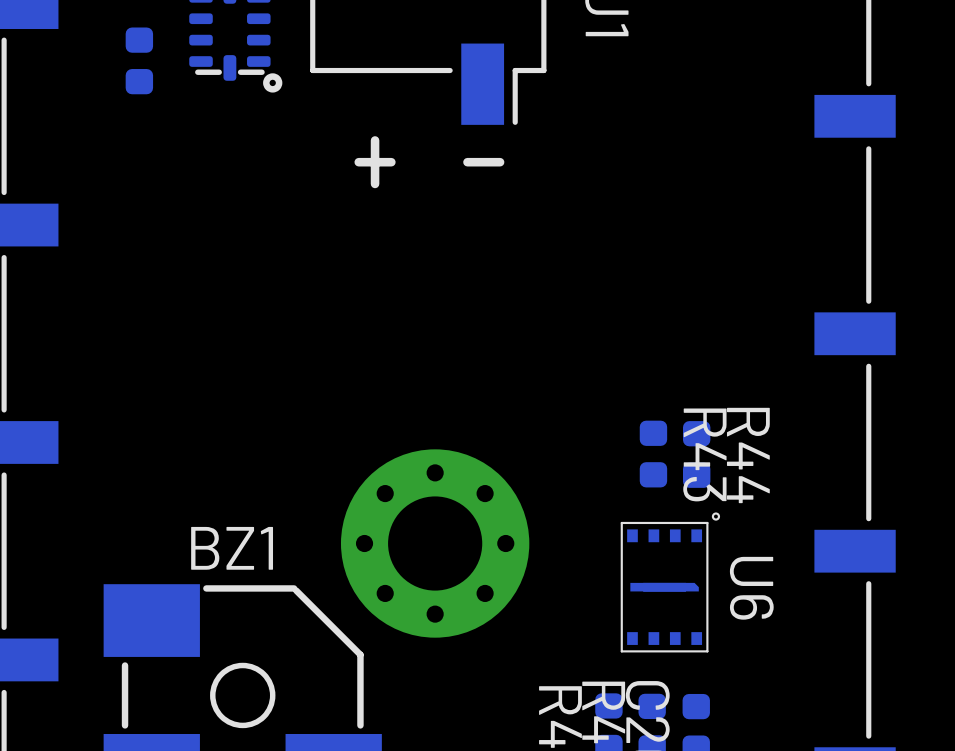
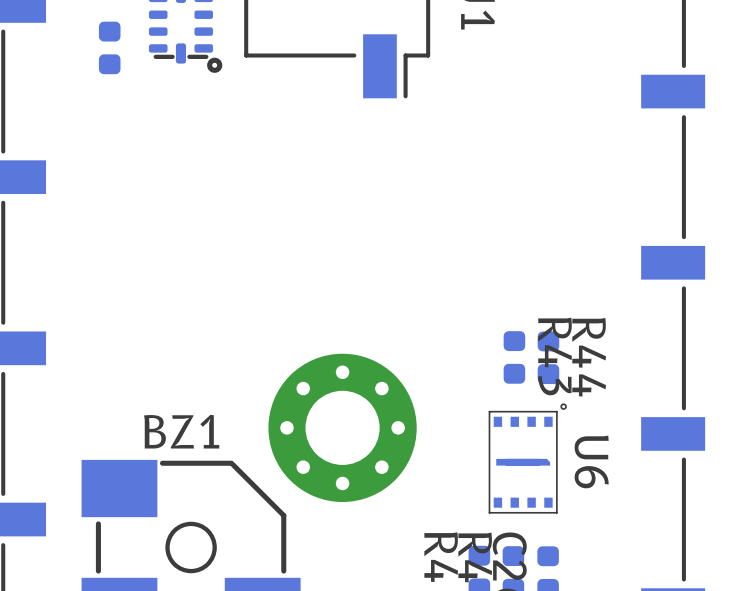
line: (375, 140) (375, 183) -> none
line: (391, 162) (358, 162) -> none
line: (500, 162) (467, 162) -> none

